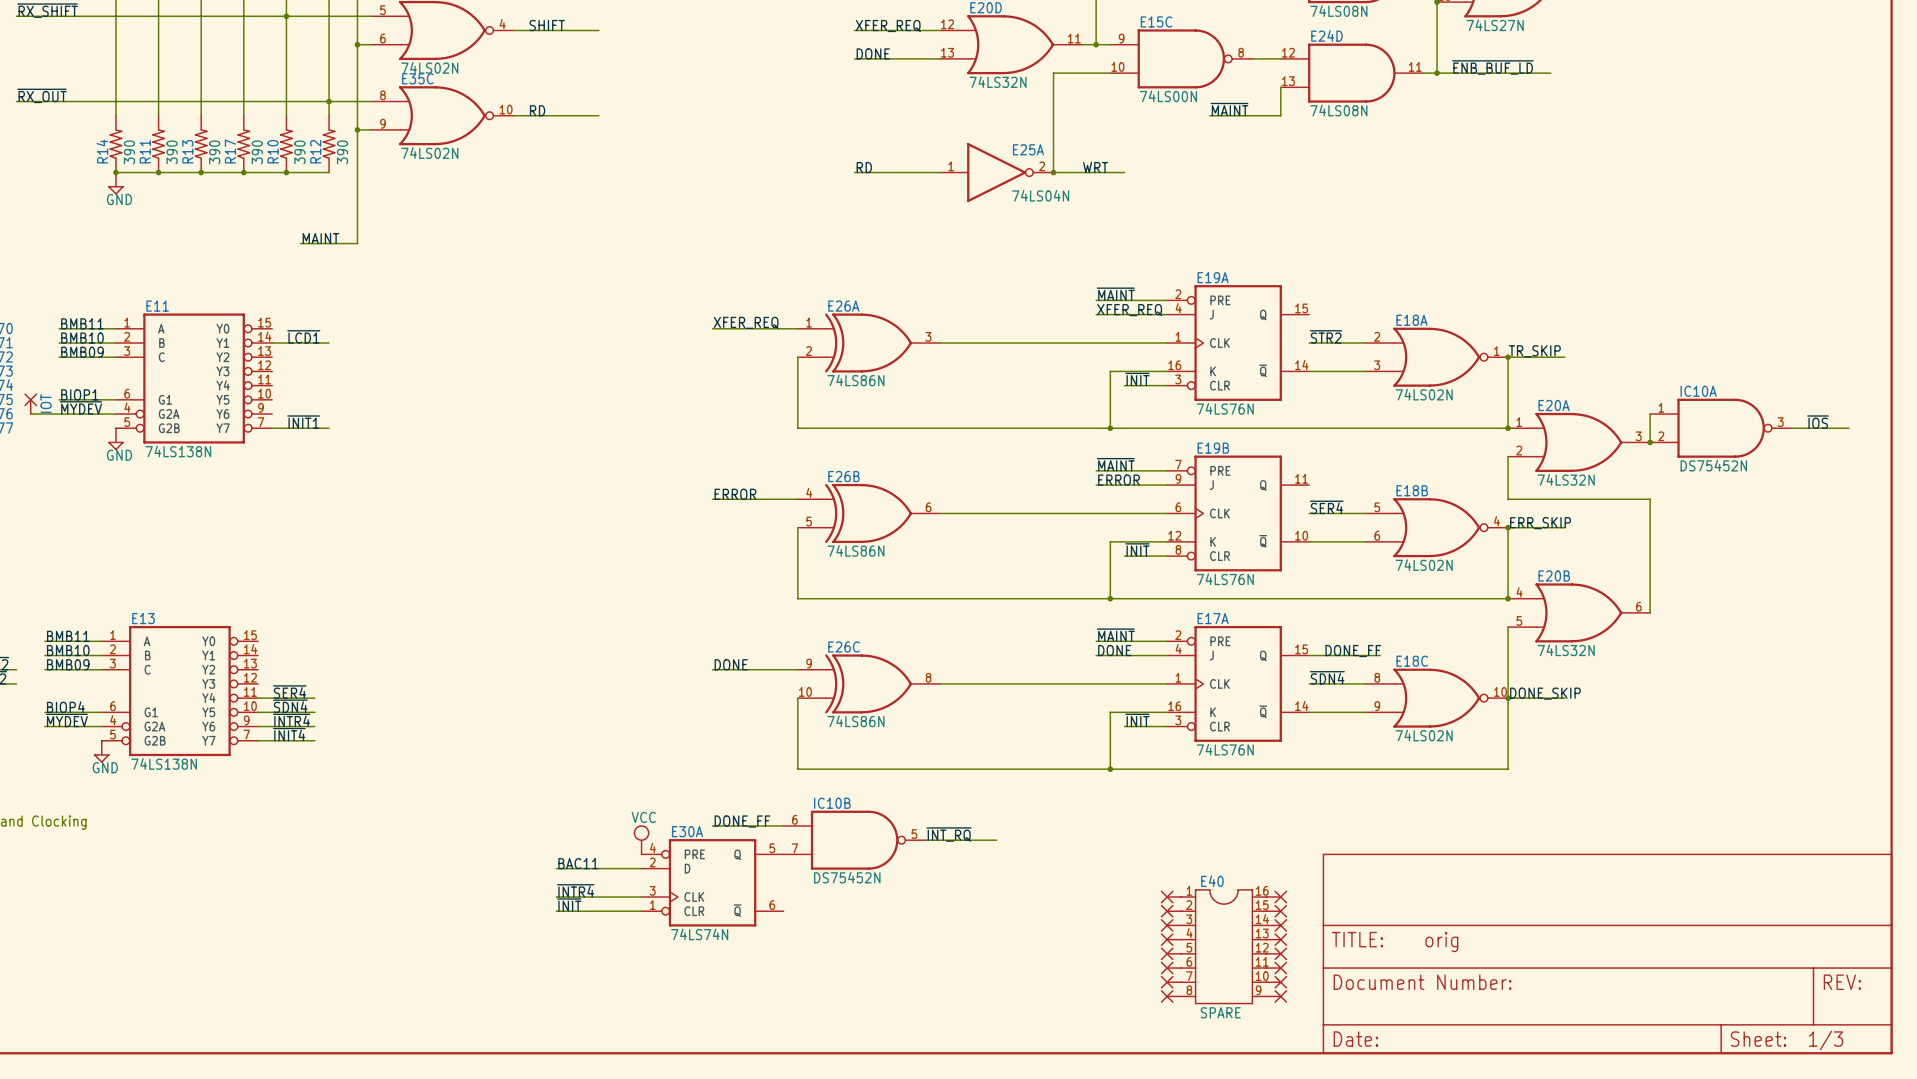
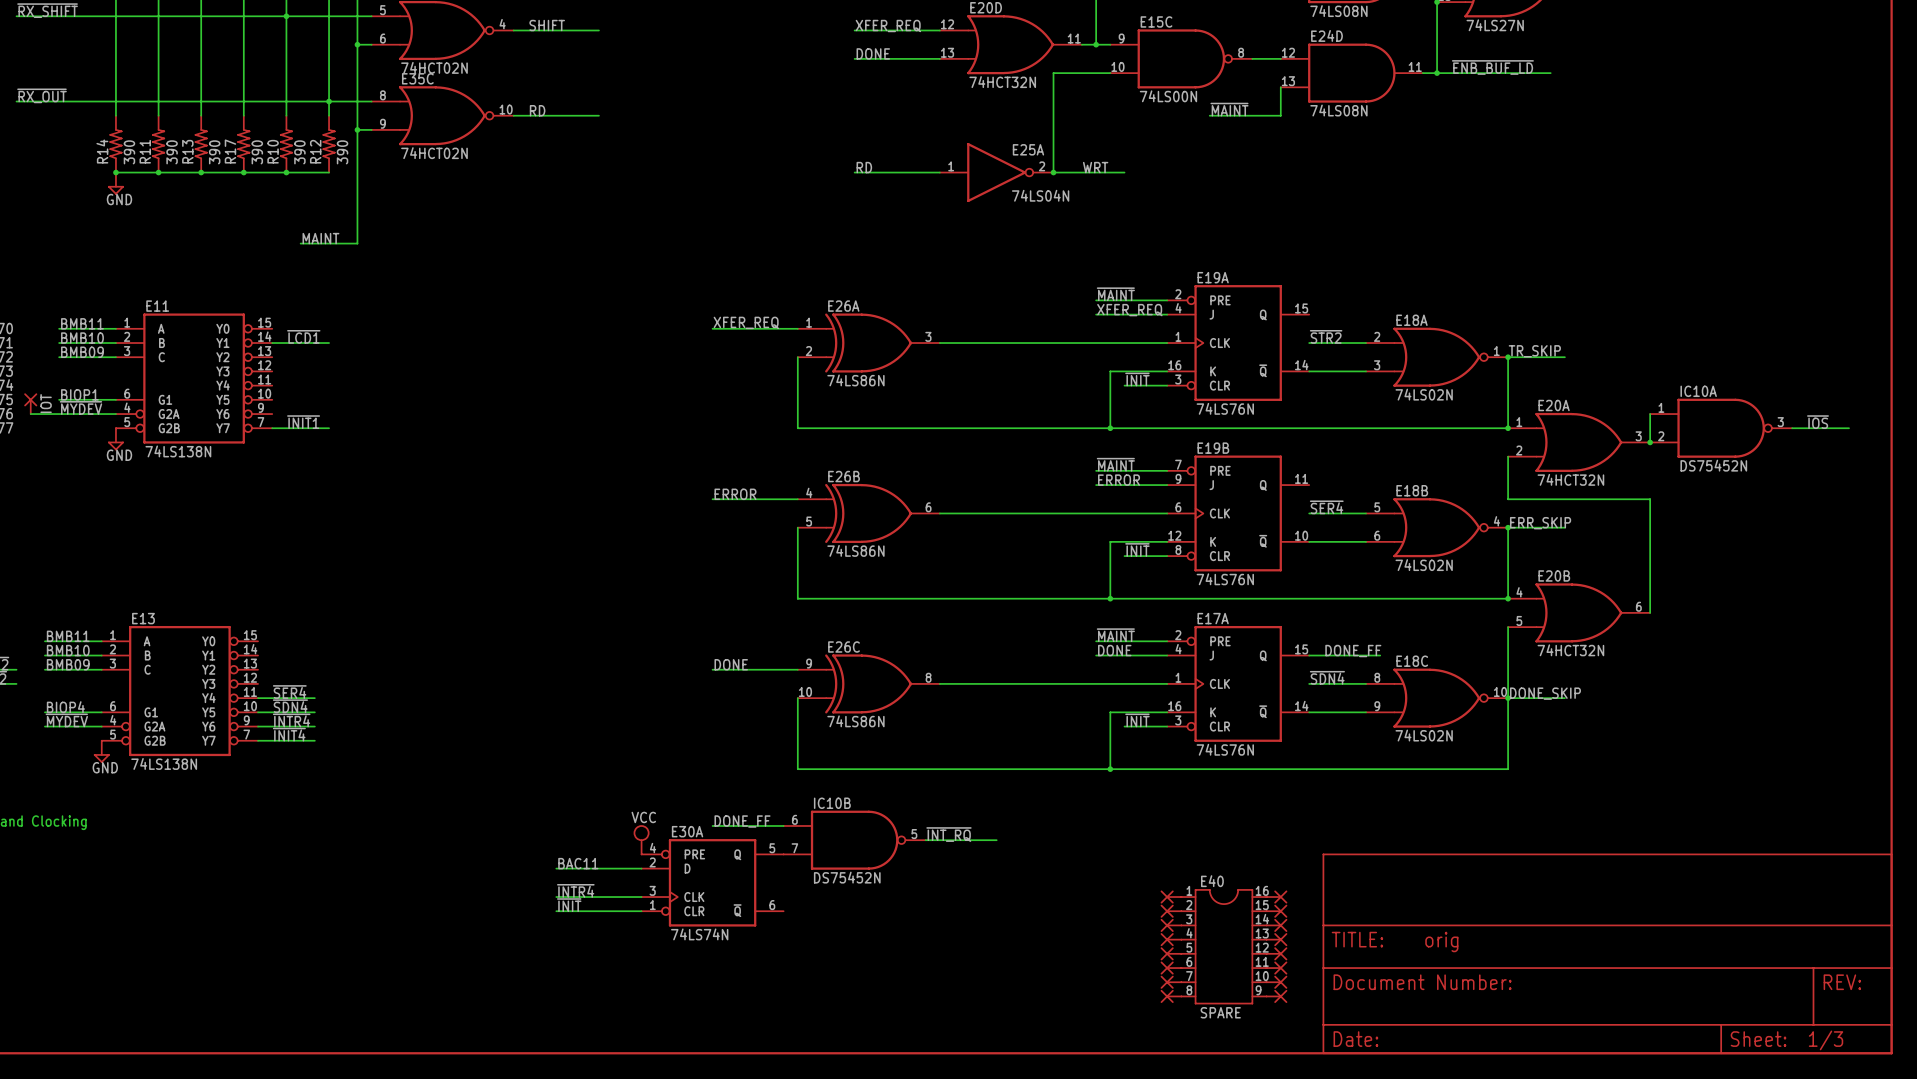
part value: 74LS02N (429, 67) -> 74HCT02N (434, 67)
E20D value: 74LS32N (997, 82) -> 74HCT32N (1002, 82)
E35C value: 74LS02N (429, 153) -> 74HCT02N (434, 153)
E20A value: 74LS32N (1566, 479) -> 74HCT32N (1570, 479)
E20B value: 74LS32N (1566, 650) -> 74HCT32N (1570, 650)

